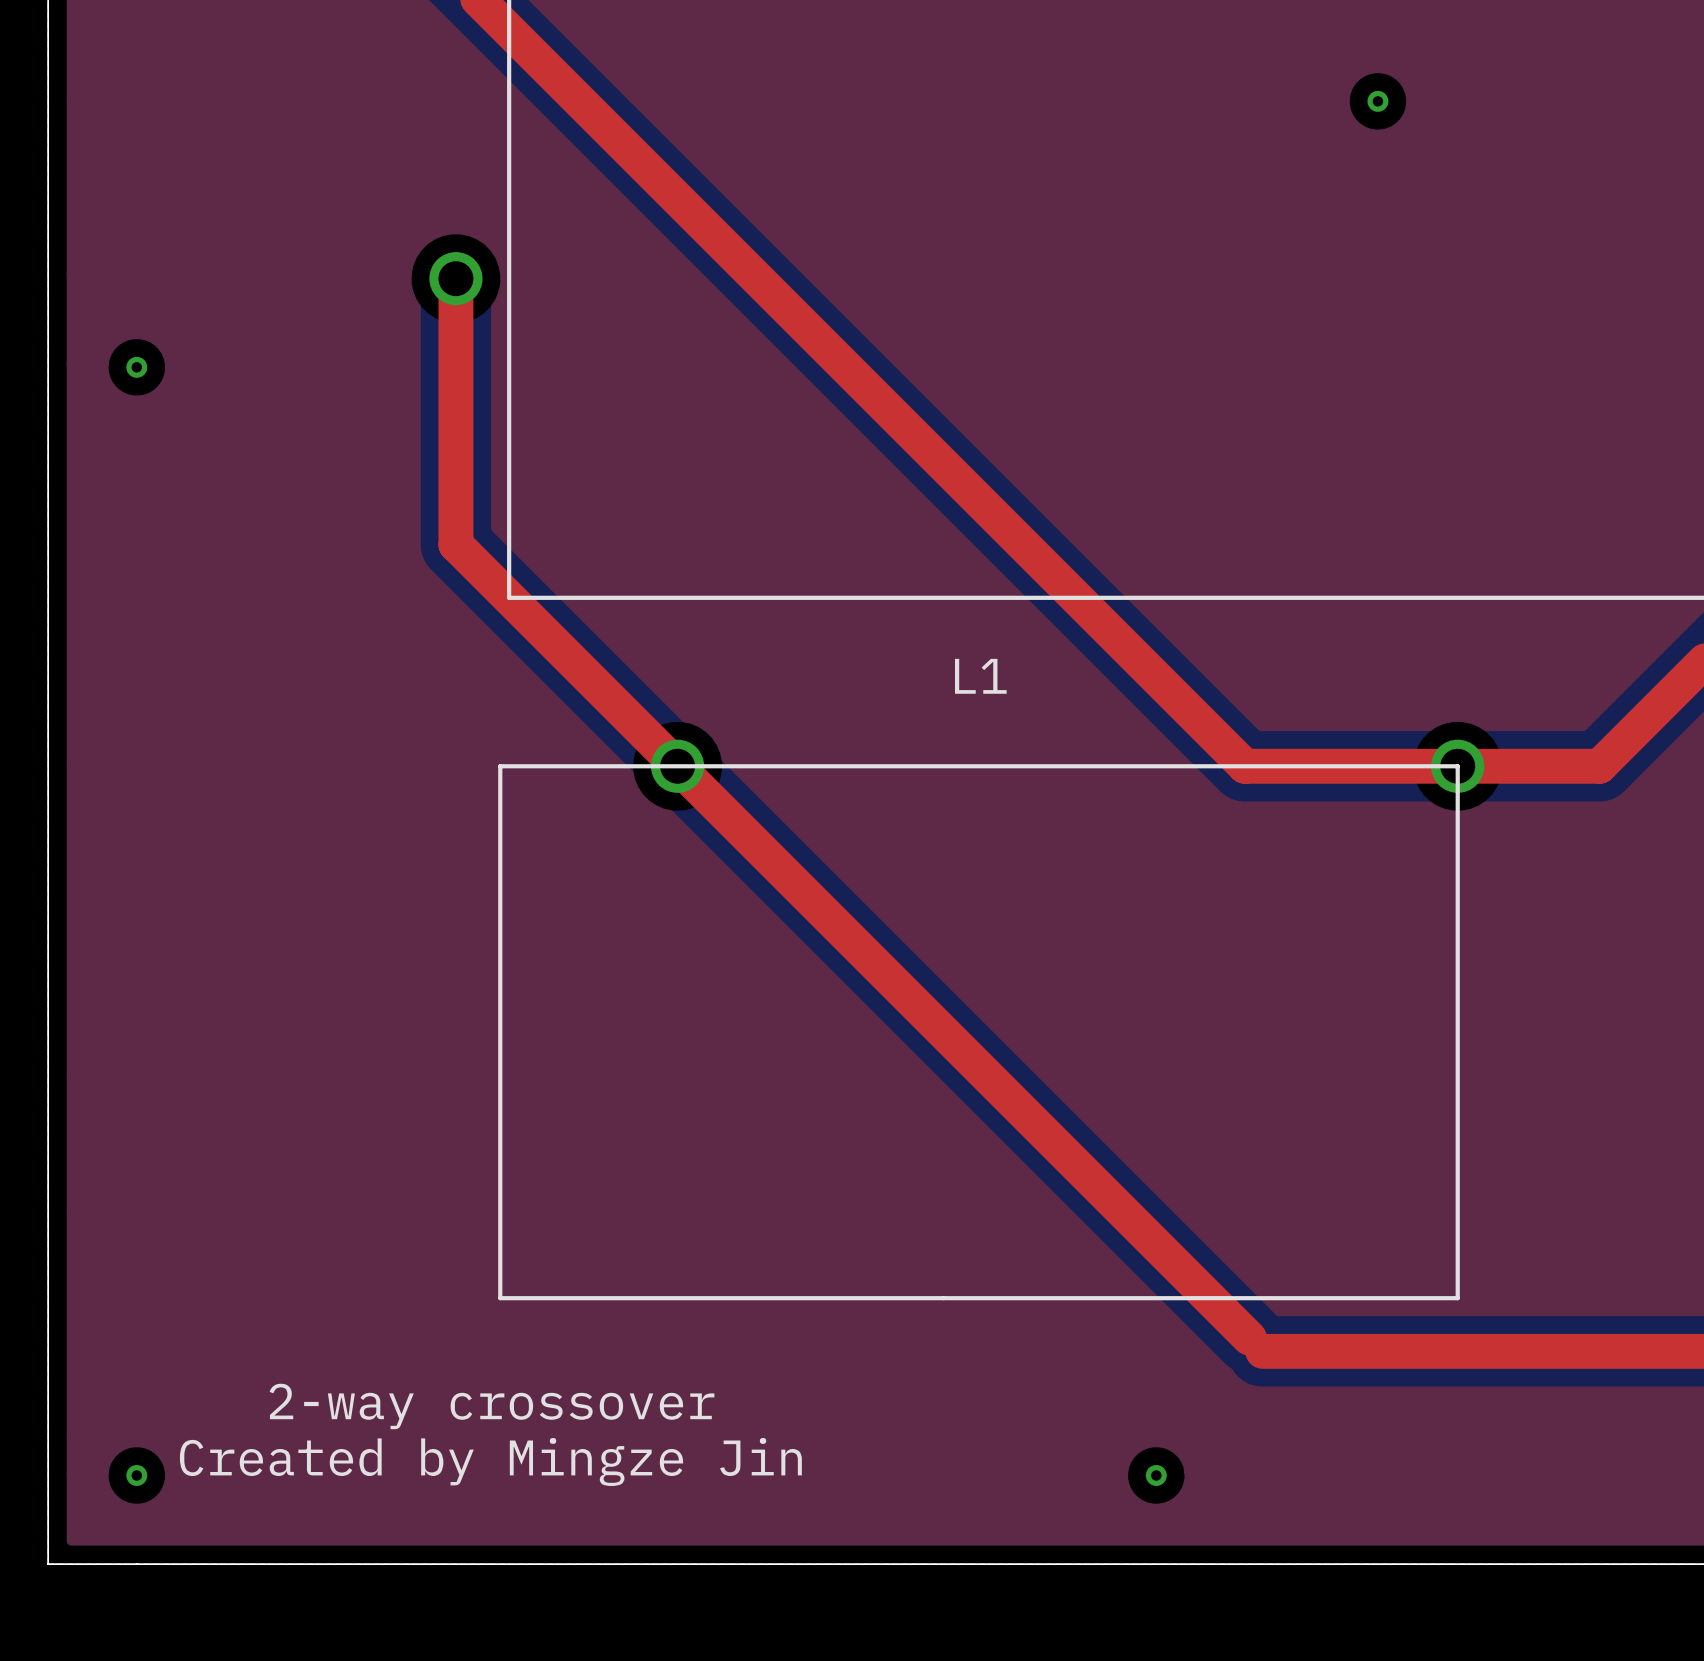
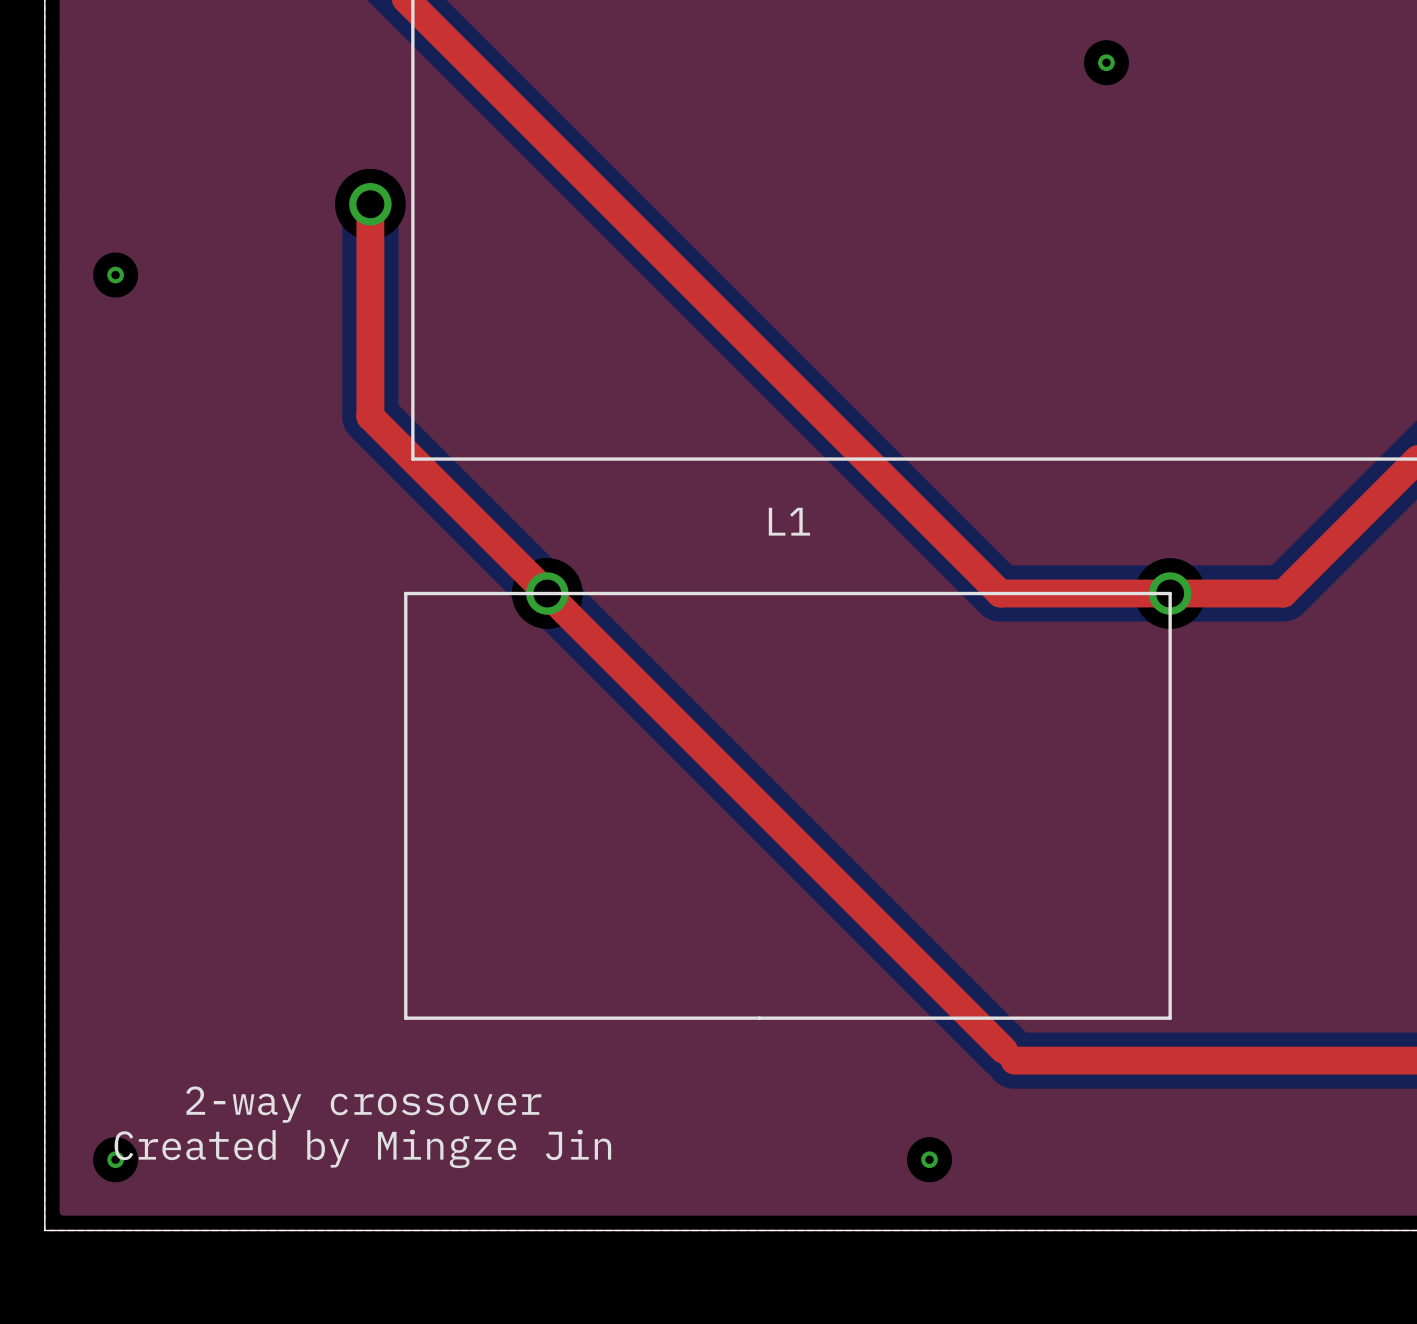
text position: 2-way crossover (492, 1406) -> 2-way crossover (363, 1104)
text position: Created by Mingze Jin (490, 1462) -> Created by Mingze Jin (362, 1148)

